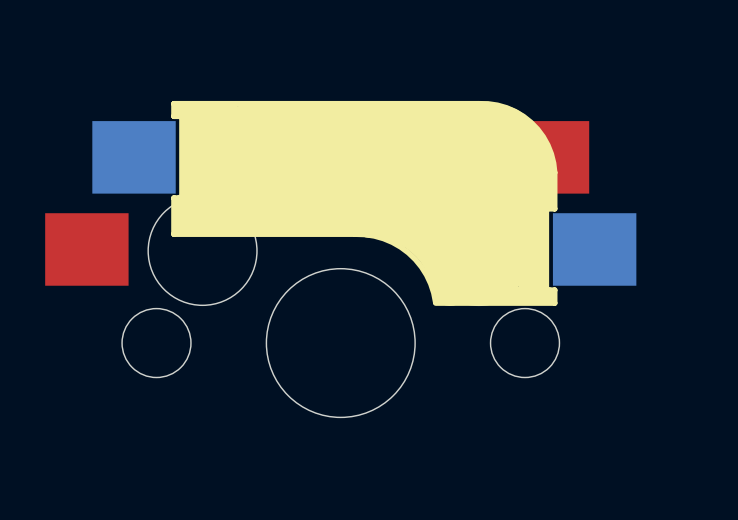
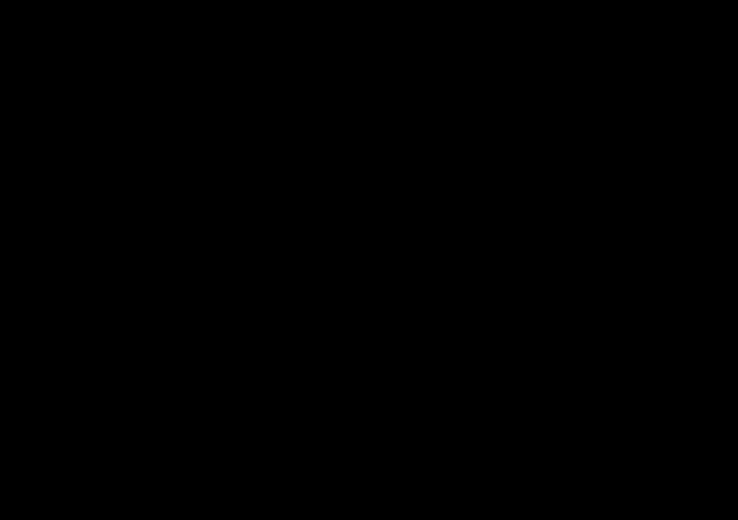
part: (340, 259) -> none

